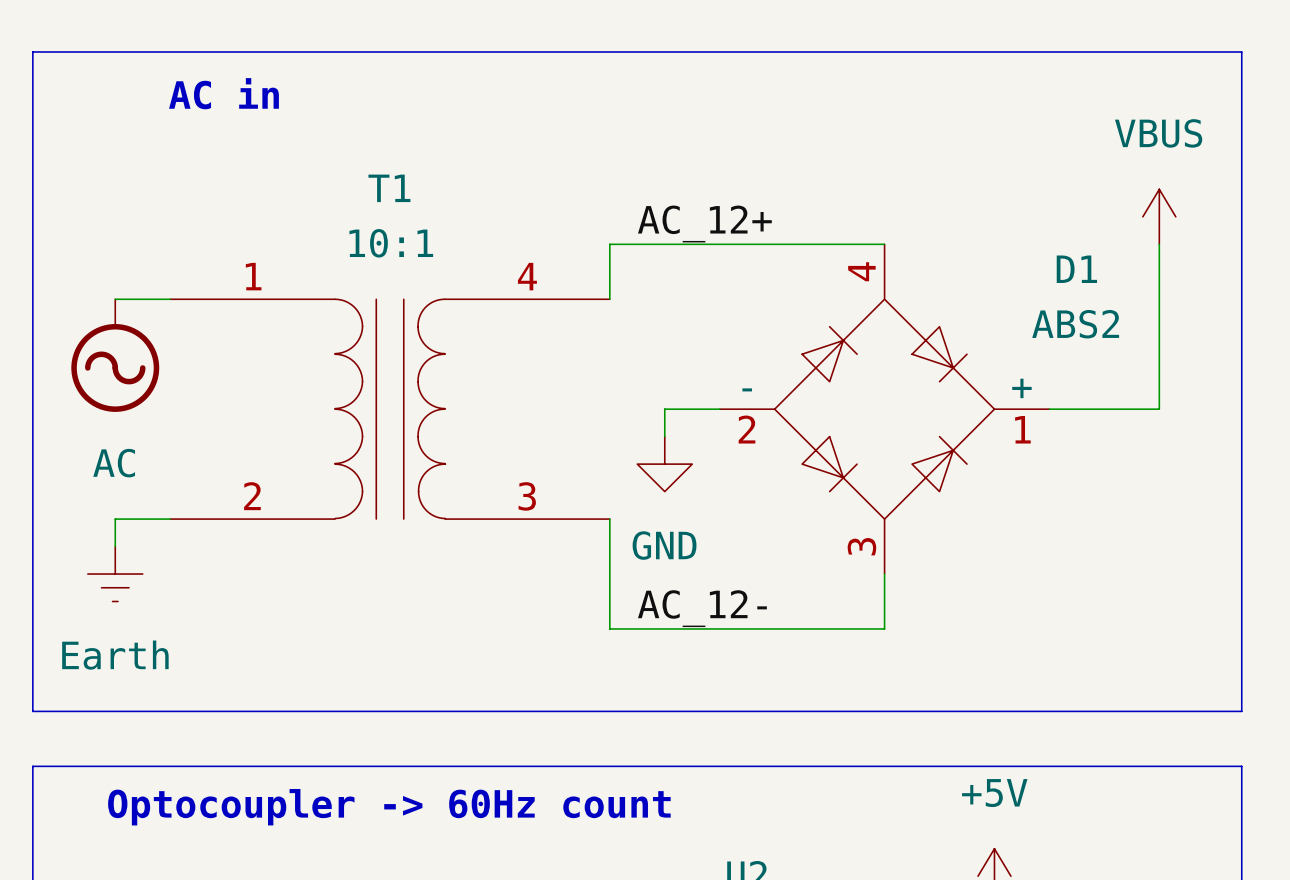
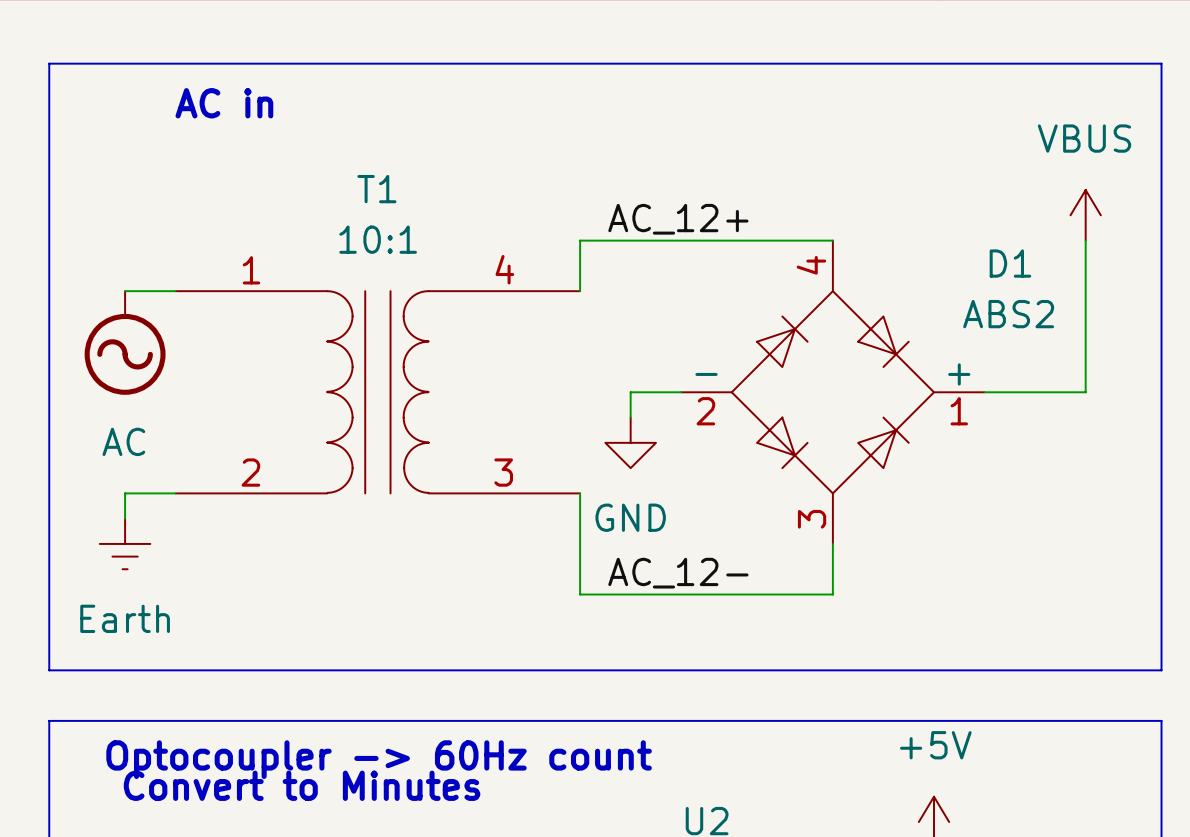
text: none -> Convert to Minutes (302, 785)

